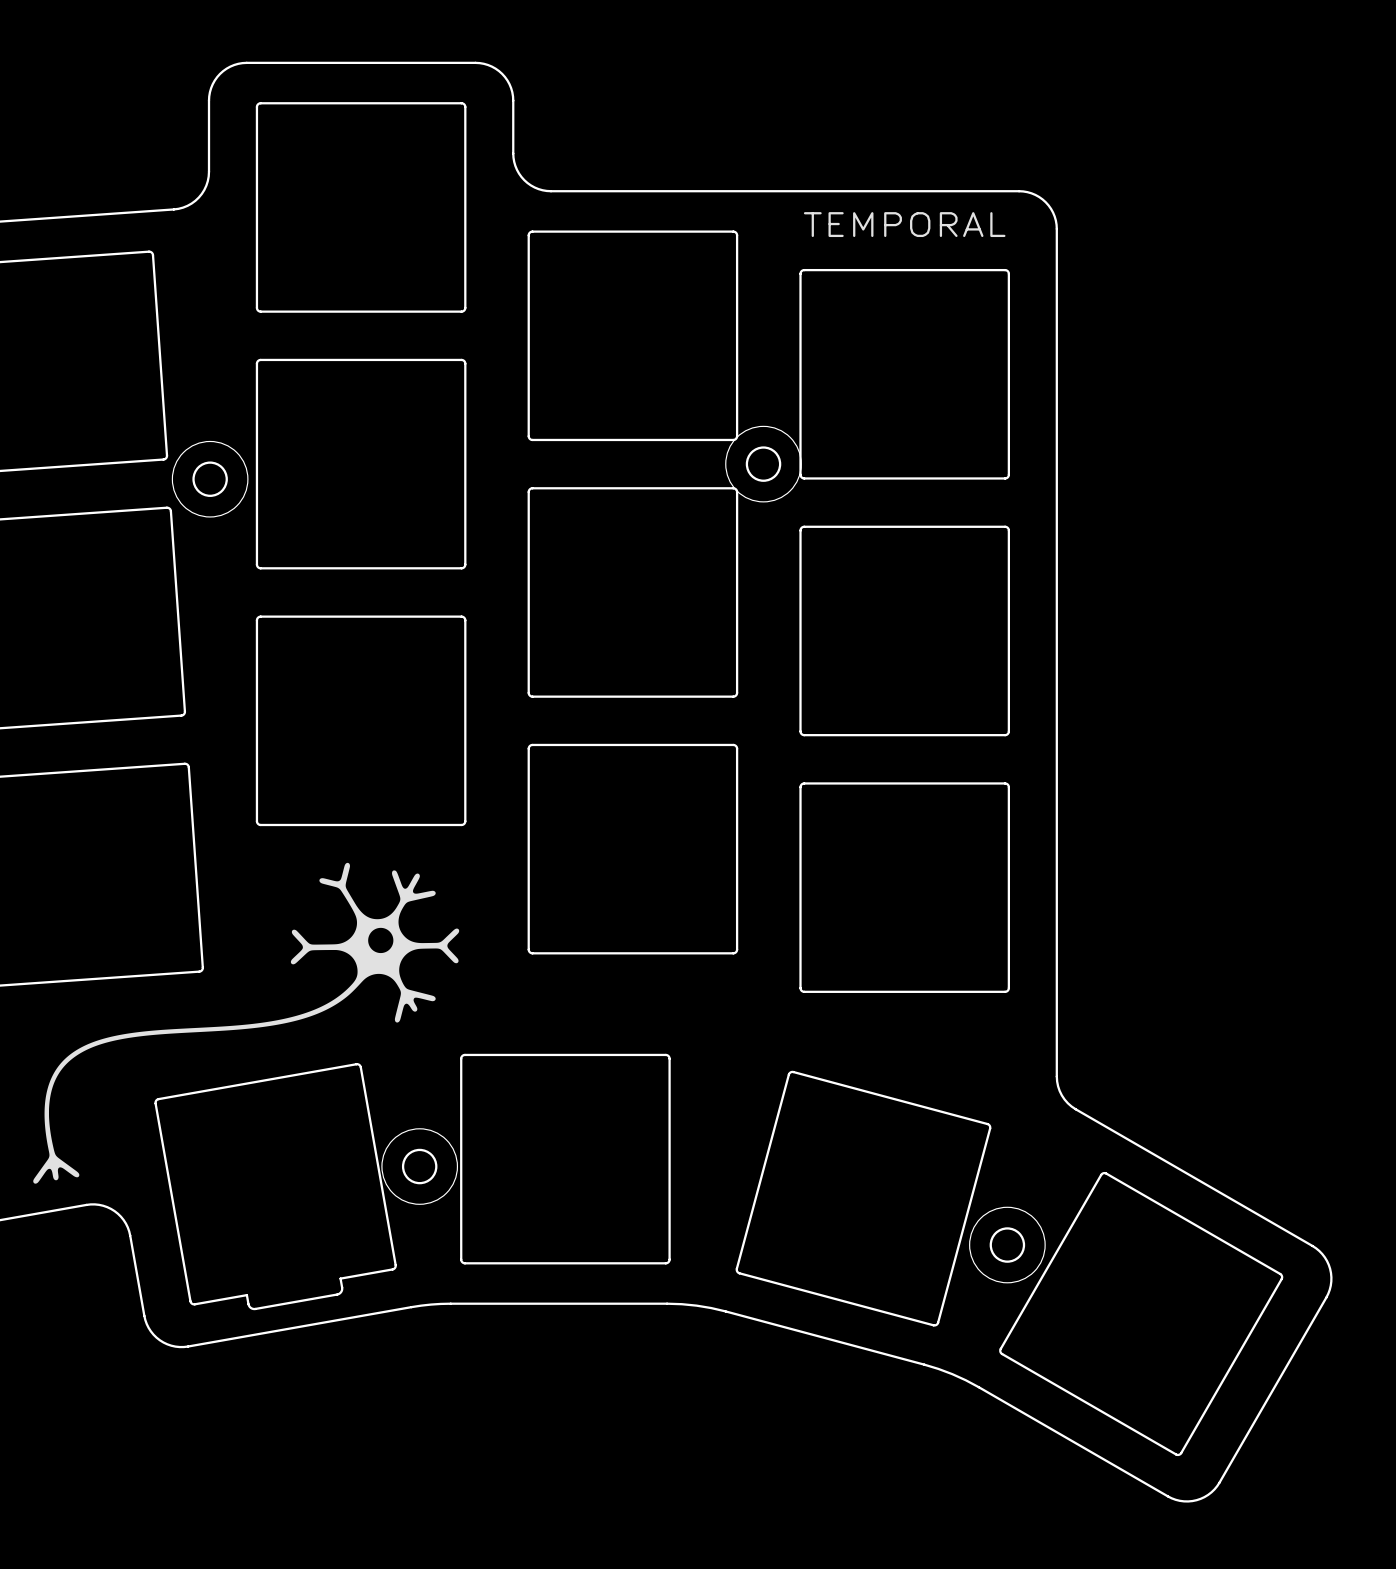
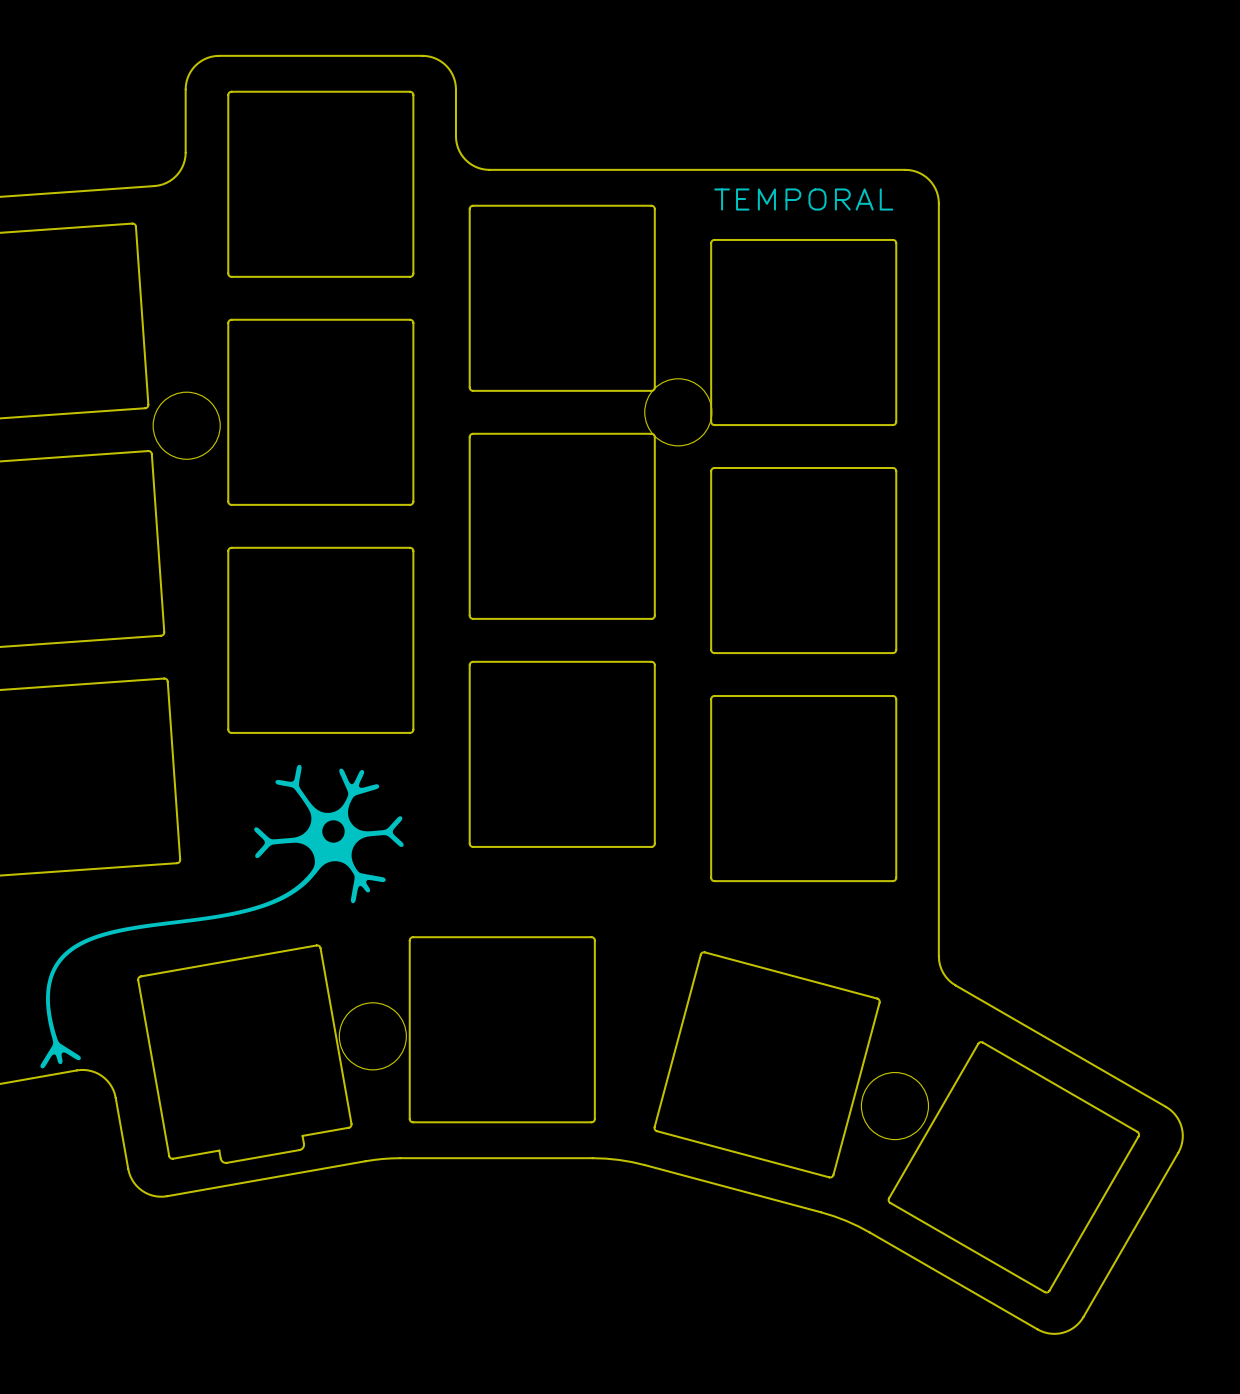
round board edge: [745, 446, 782, 482] -> none
round board edge: [192, 461, 228, 497] -> none
drawing shape: [33, 862, 460, 1184] -> [40, 764, 404, 1069]
round board edge: [401, 1148, 438, 1185] -> none
round board edge: [989, 1227, 1026, 1263] -> none

